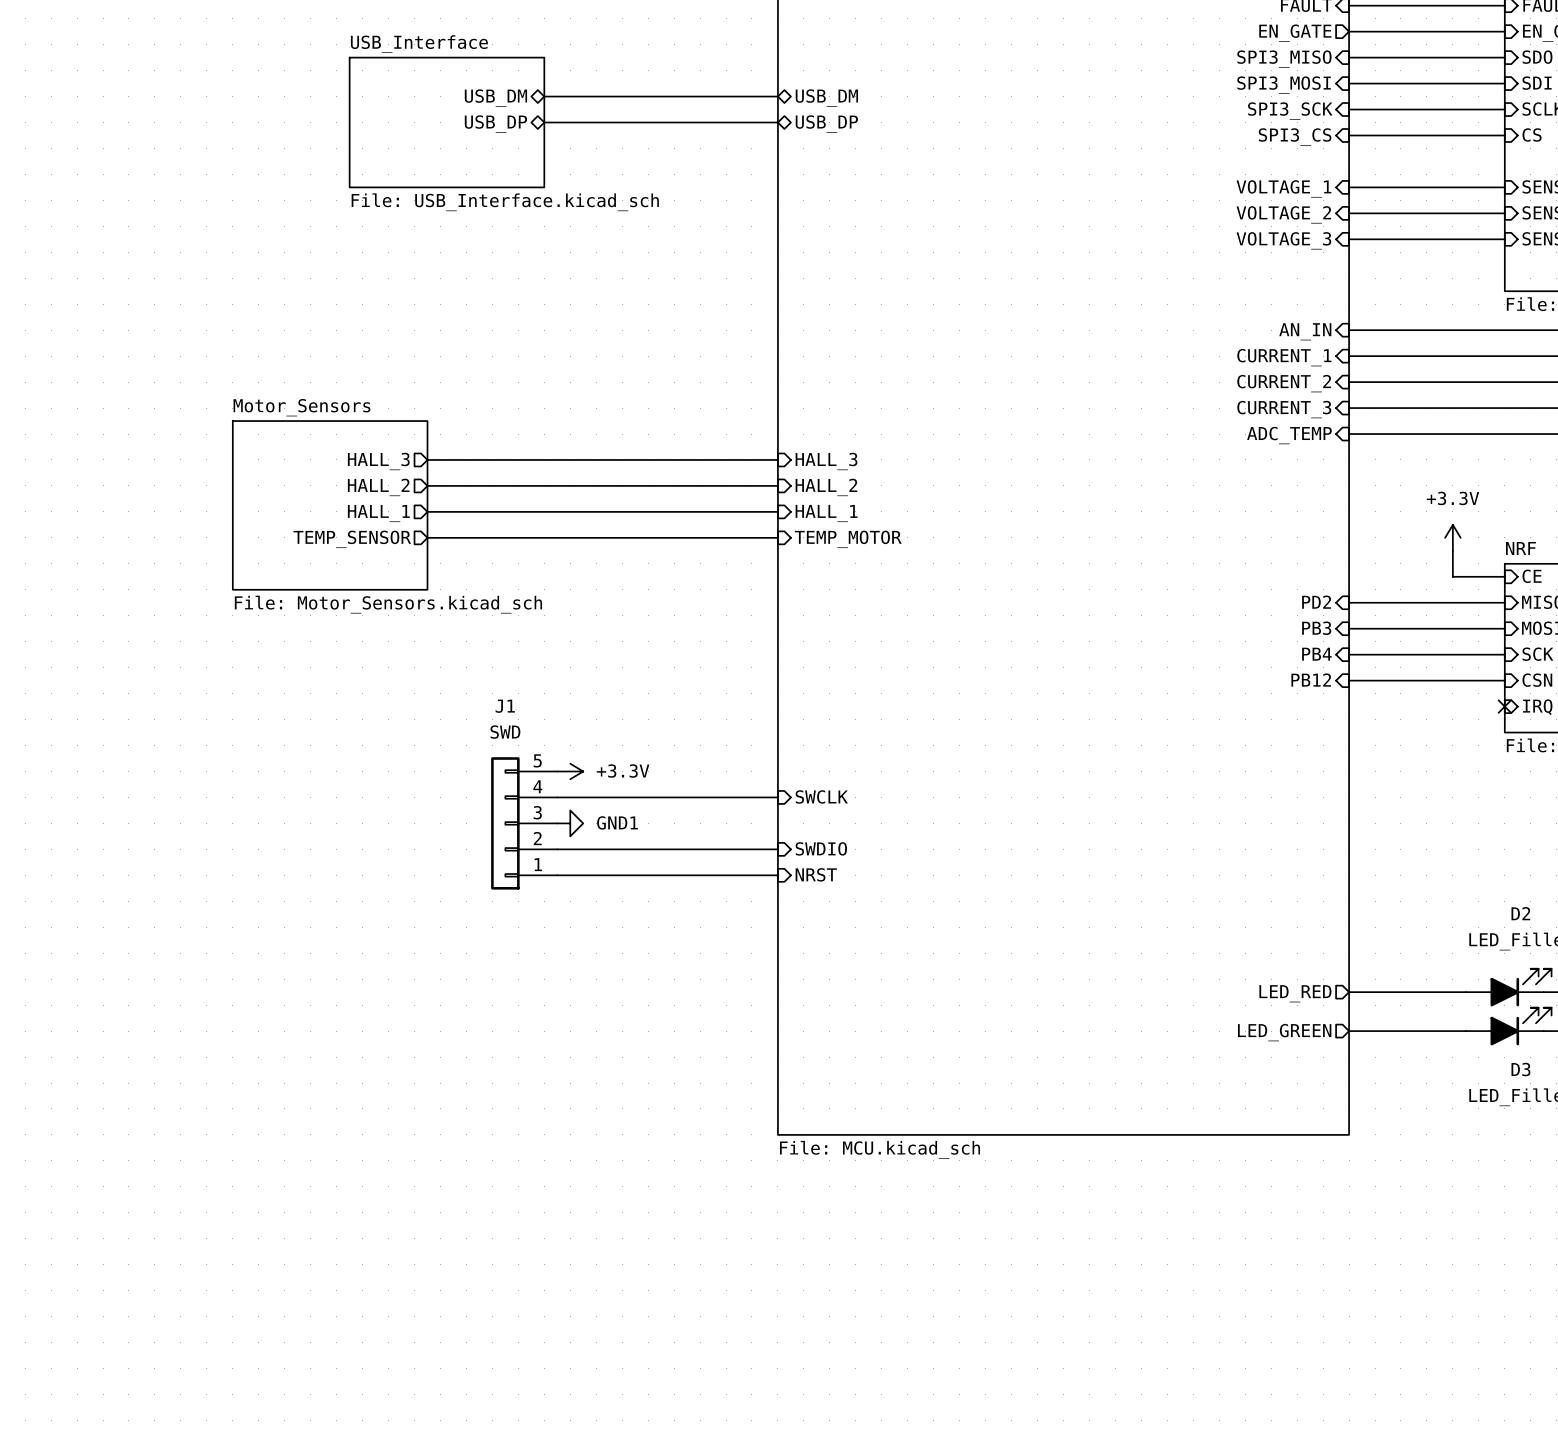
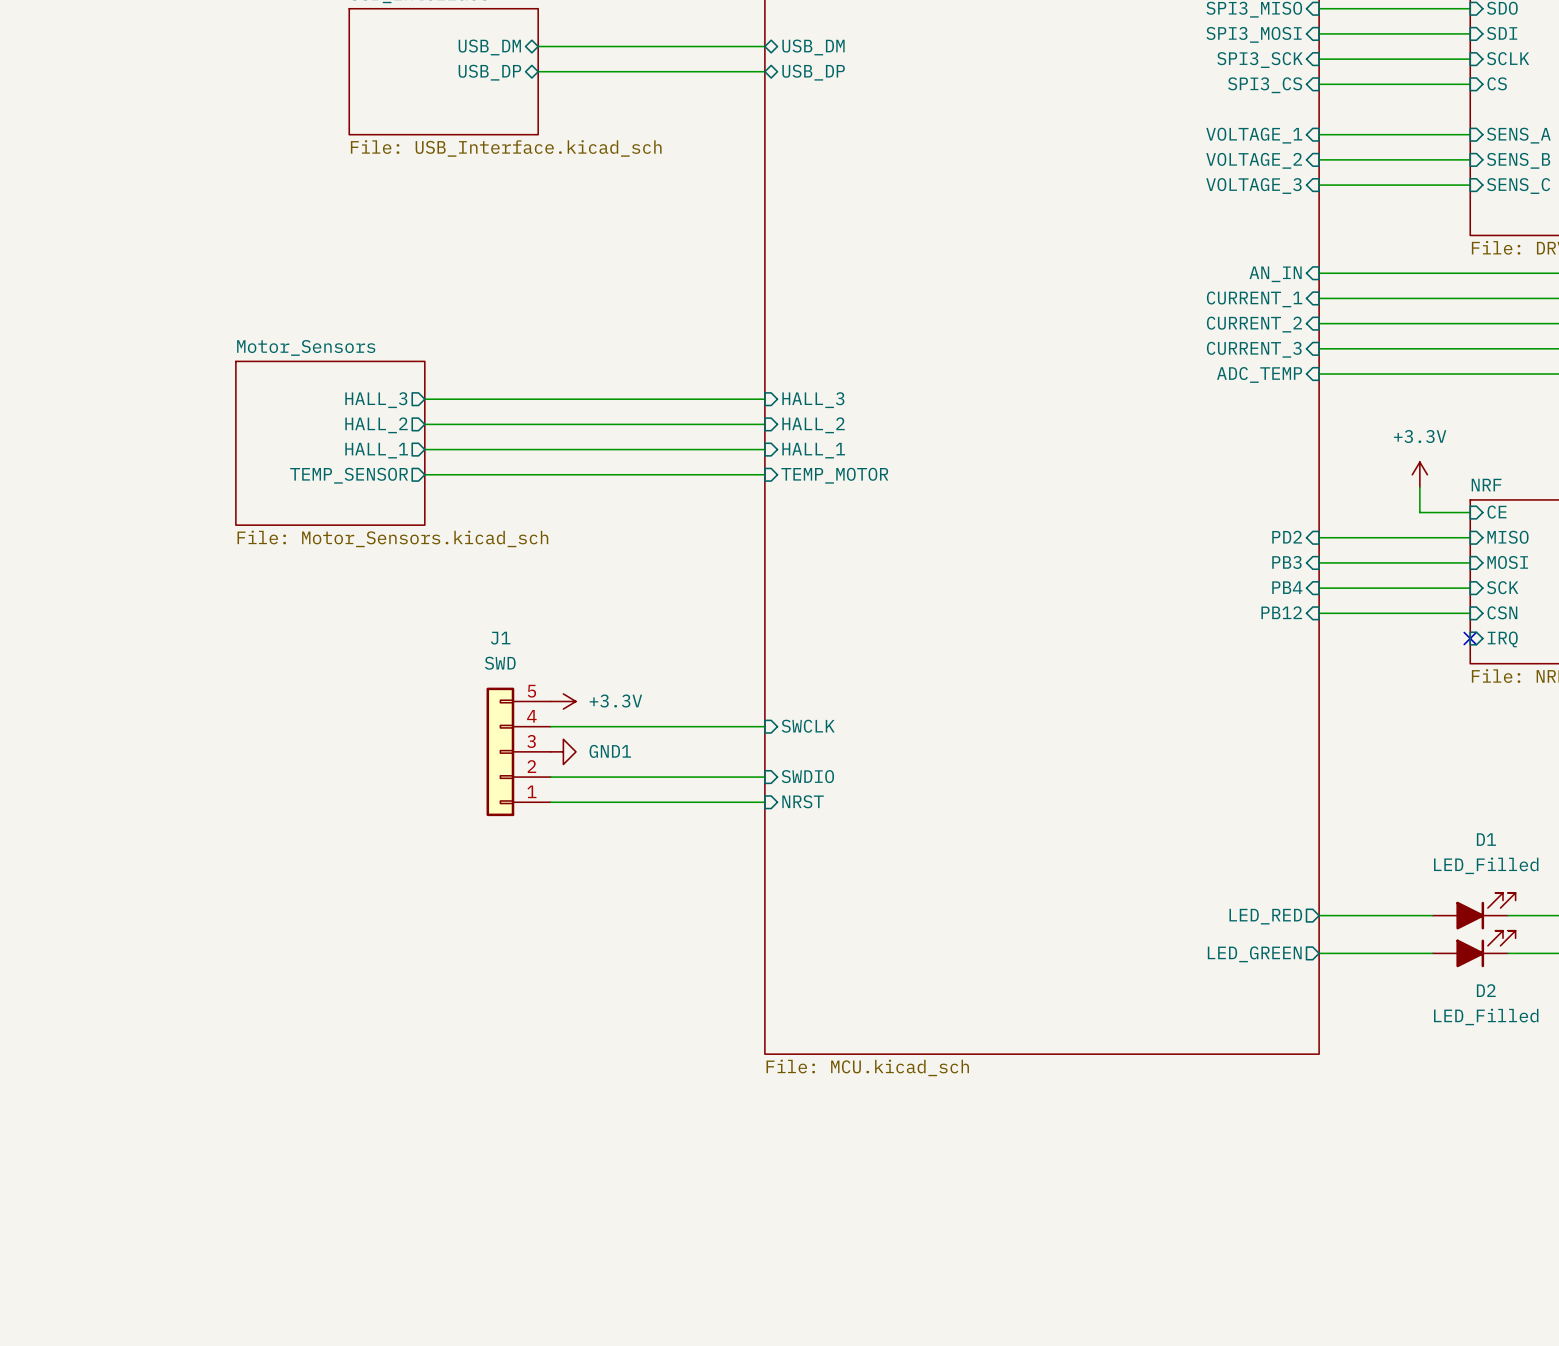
D2 name: D2 (1520, 913) -> D1 (1486, 839)
D3 name: D3 (1520, 1069) -> D2 (1486, 990)

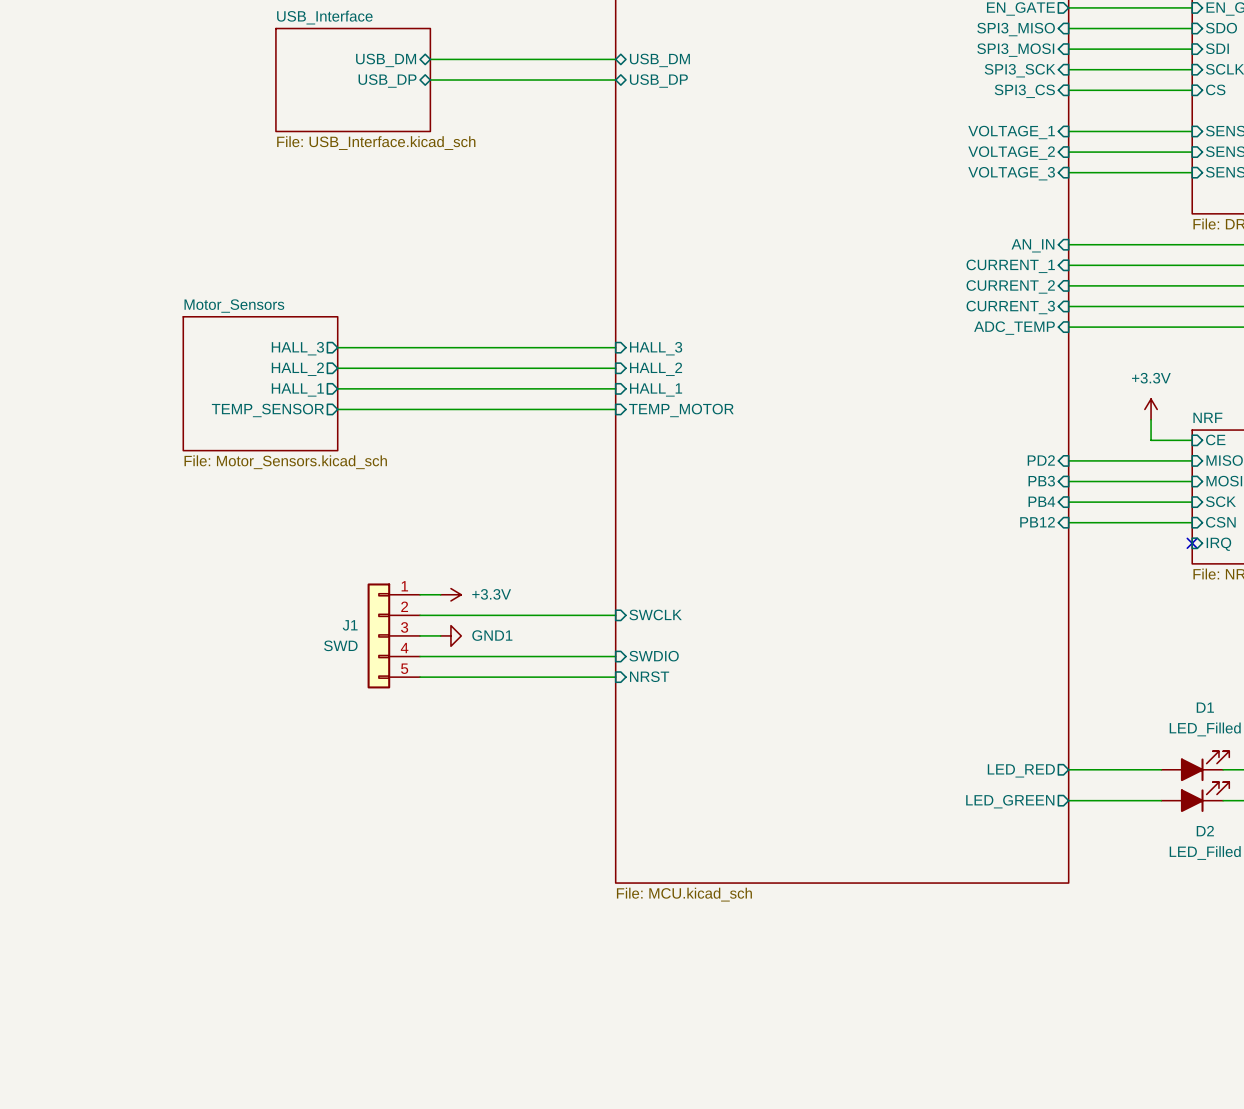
J1 name position: J1 (500, 638) -> J1 (350, 625)
J1 value position: SWD (500, 663) -> SWD (340, 645)
J1 flip: as is (500, 751) -> up-down (378, 635)

